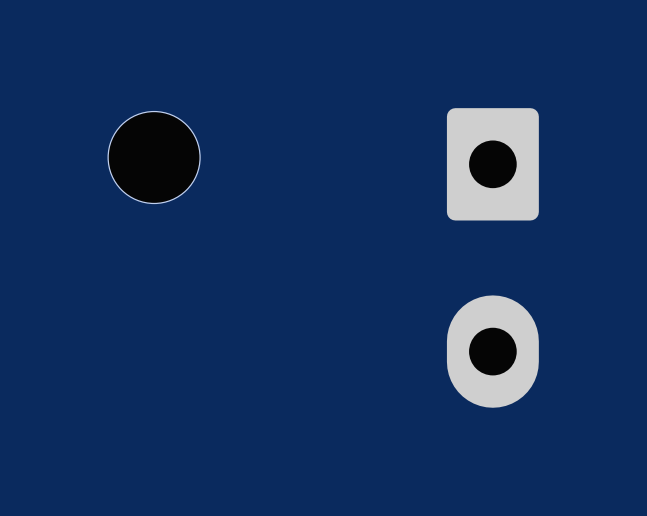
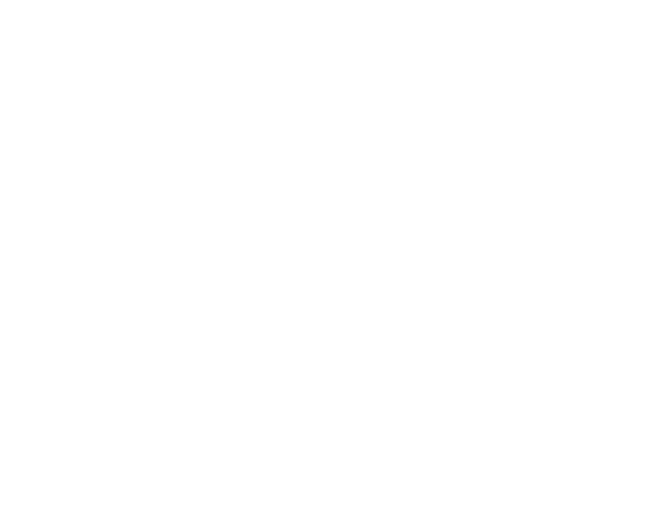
part: (154, 157) -> none
part: (492, 257) -> none

